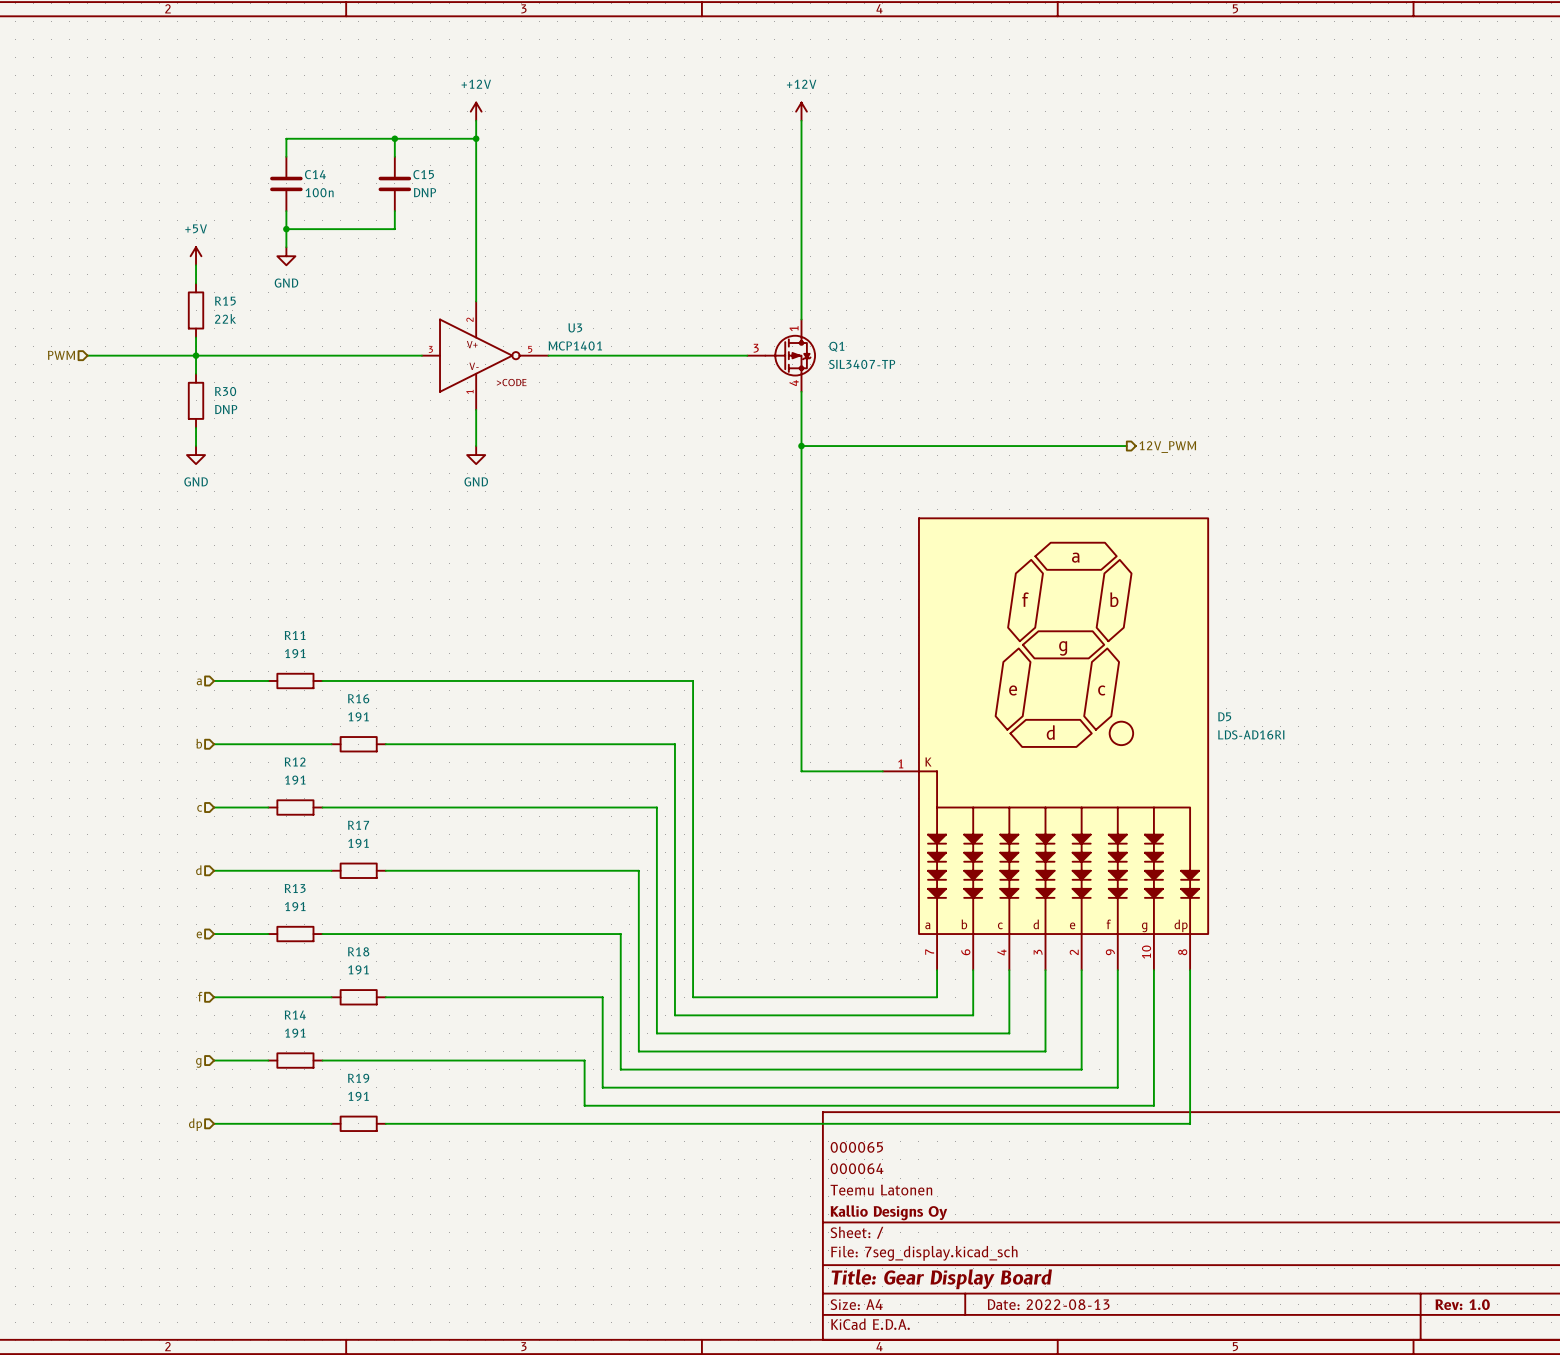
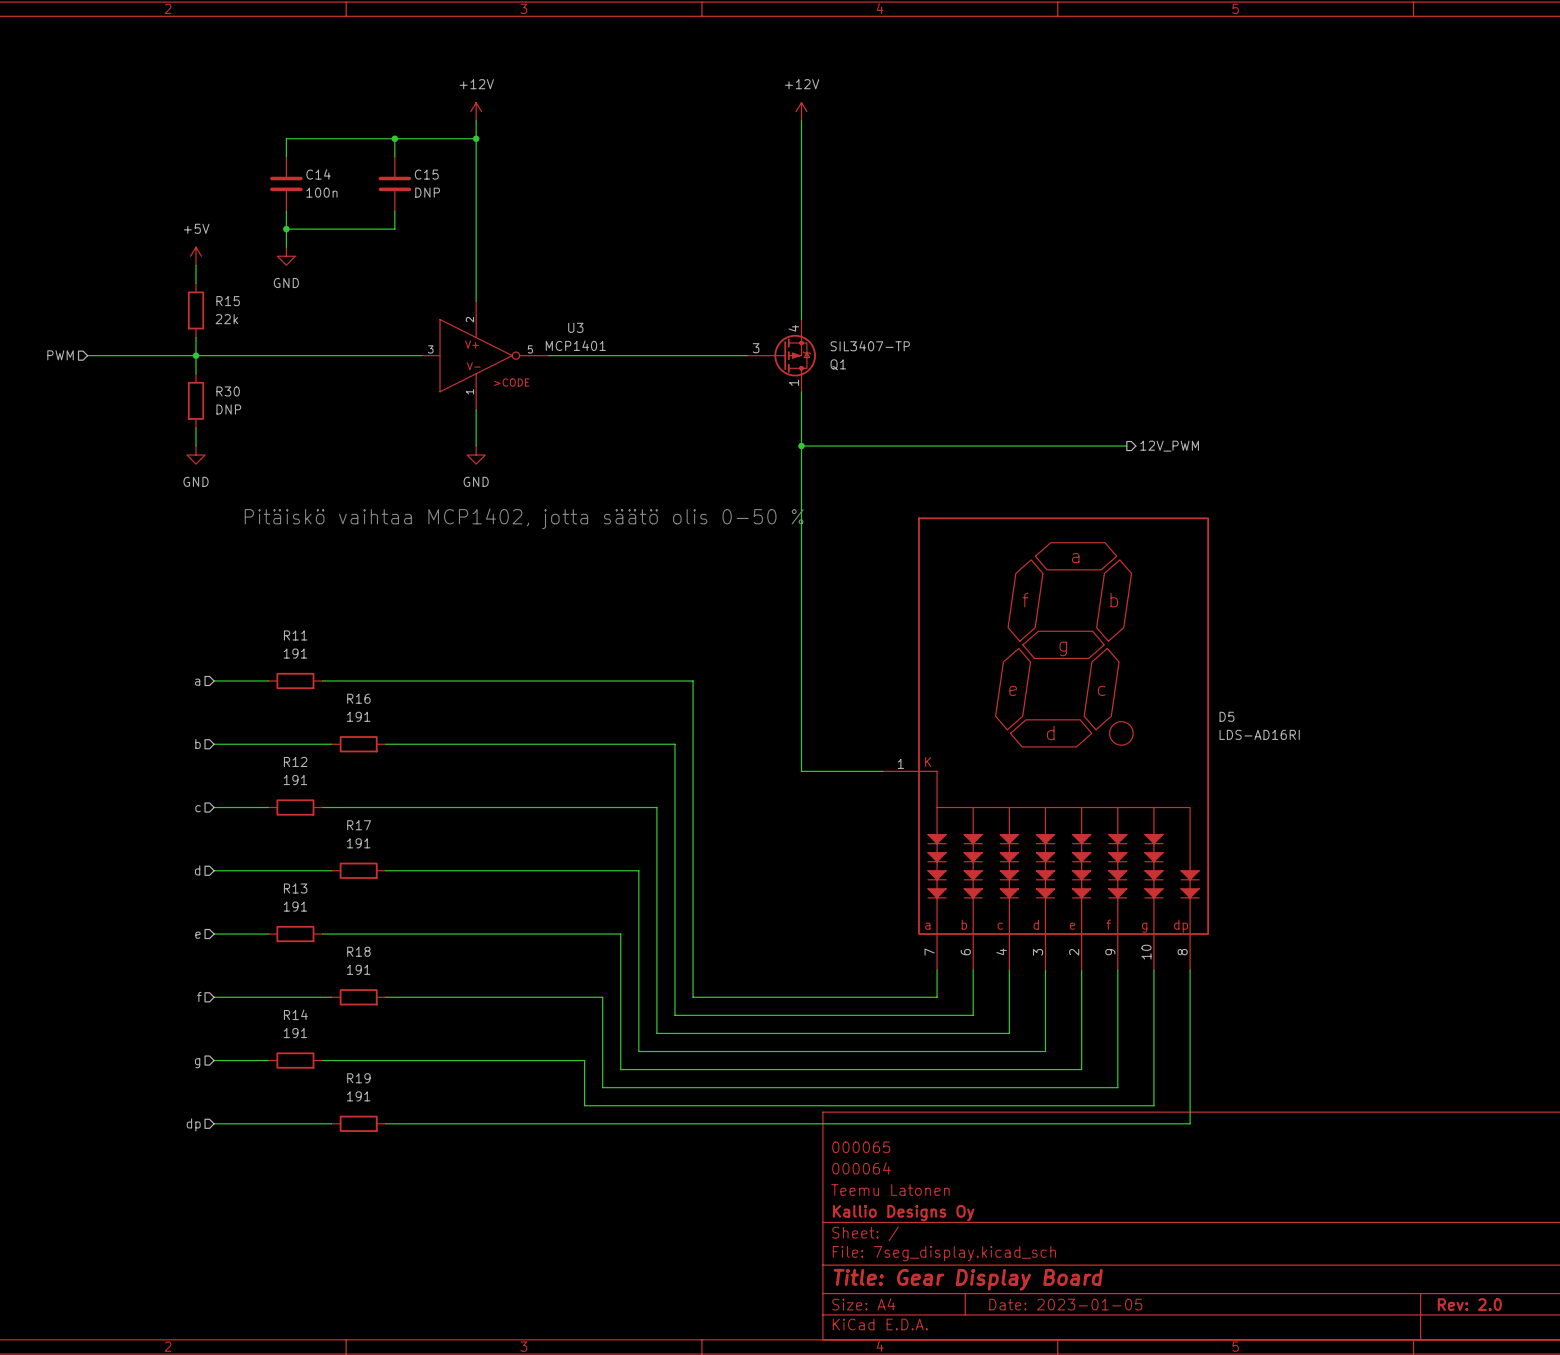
Q1 flip: as is (790, 355) -> up-down (790, 355)
text: none -> Pitäiskö vaihtaa MCP1402, jotta säätö olis 0-50 % (524, 518)
title block: Date: 2022-08-13 (1048, 1304) -> Date: 2023-01-05 (1065, 1304)
title block: Rev: 1.0 (1462, 1304) -> Rev: 2.0 (1469, 1304)

